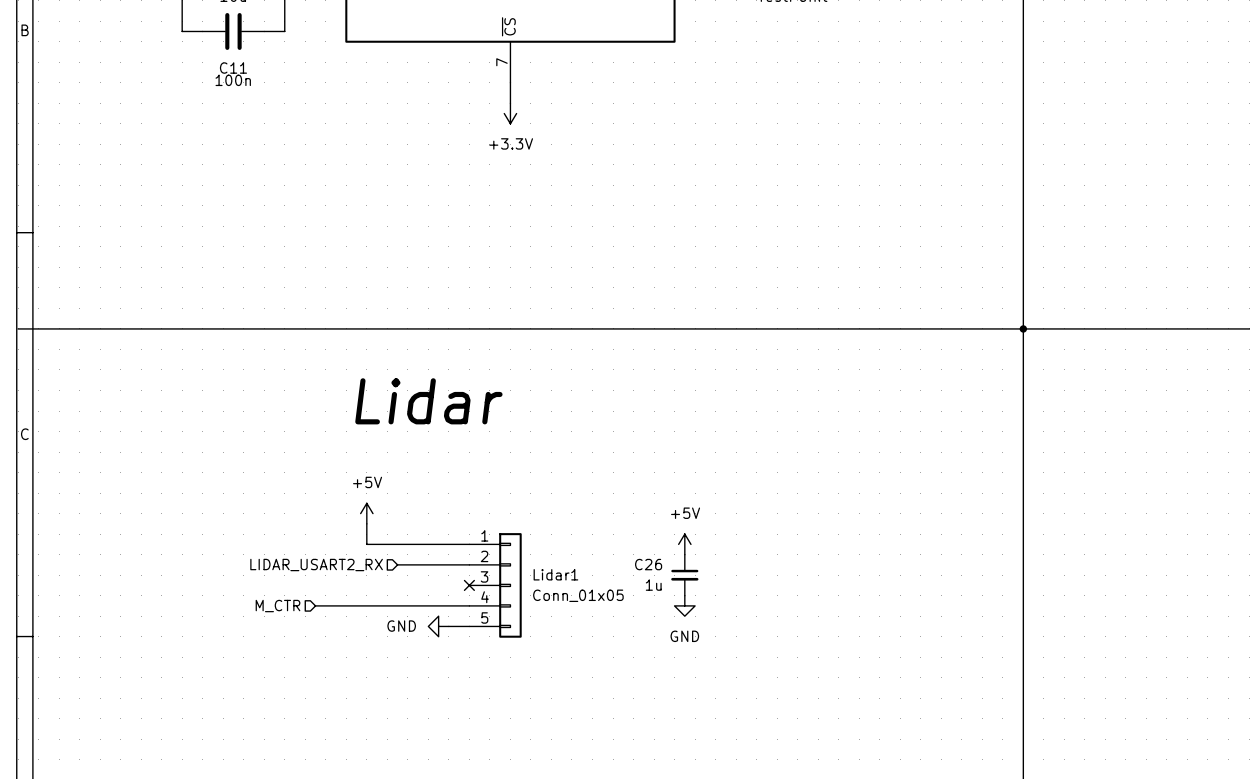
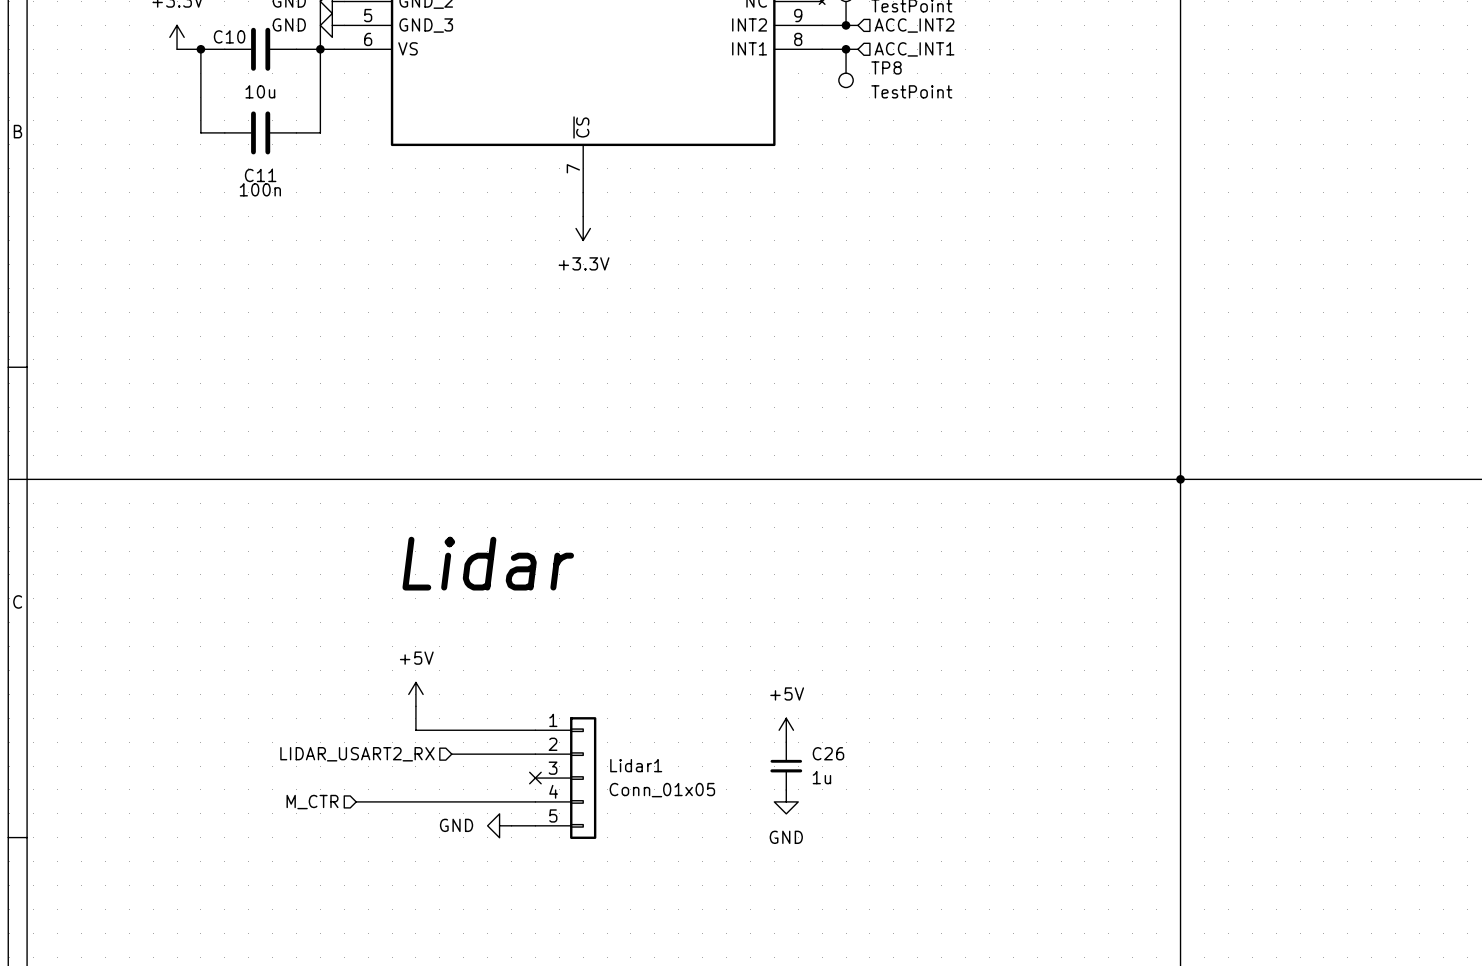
C26 name position: C26 (648, 564) -> C26 (828, 753)
C26 value position: 1u (653, 585) -> 1u (821, 777)

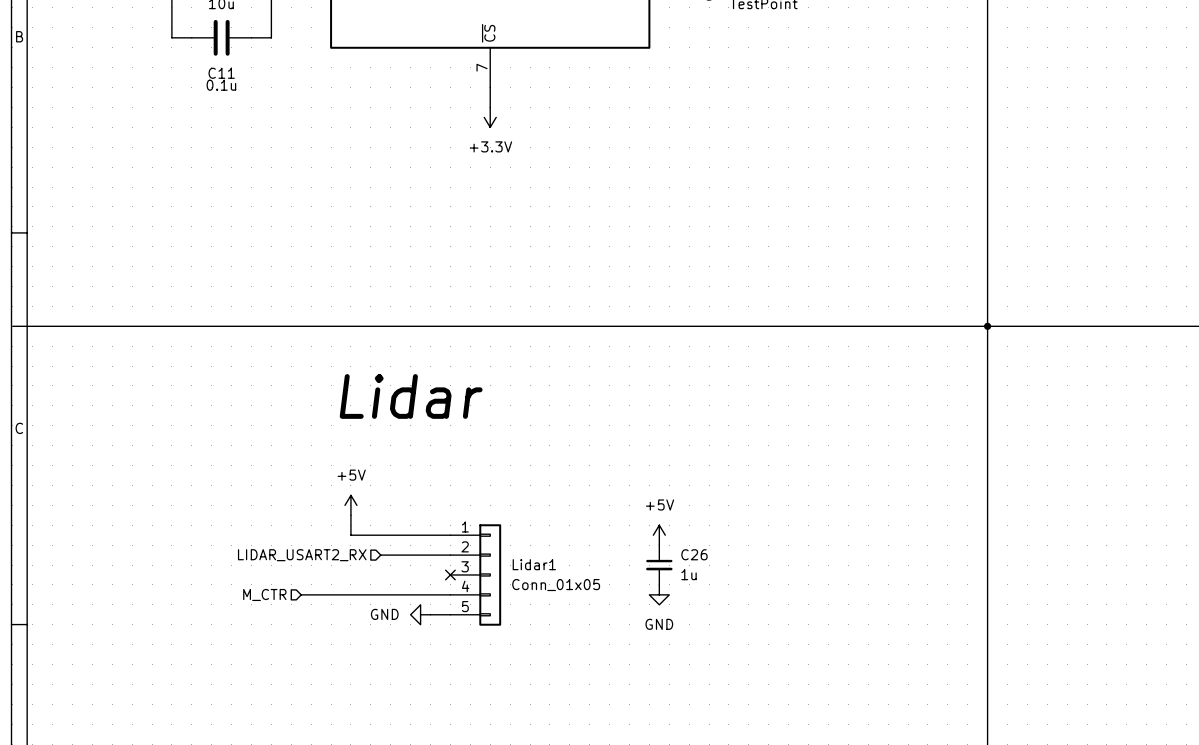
C11 value: 100n (260, 189) -> 0.1u (221, 85)

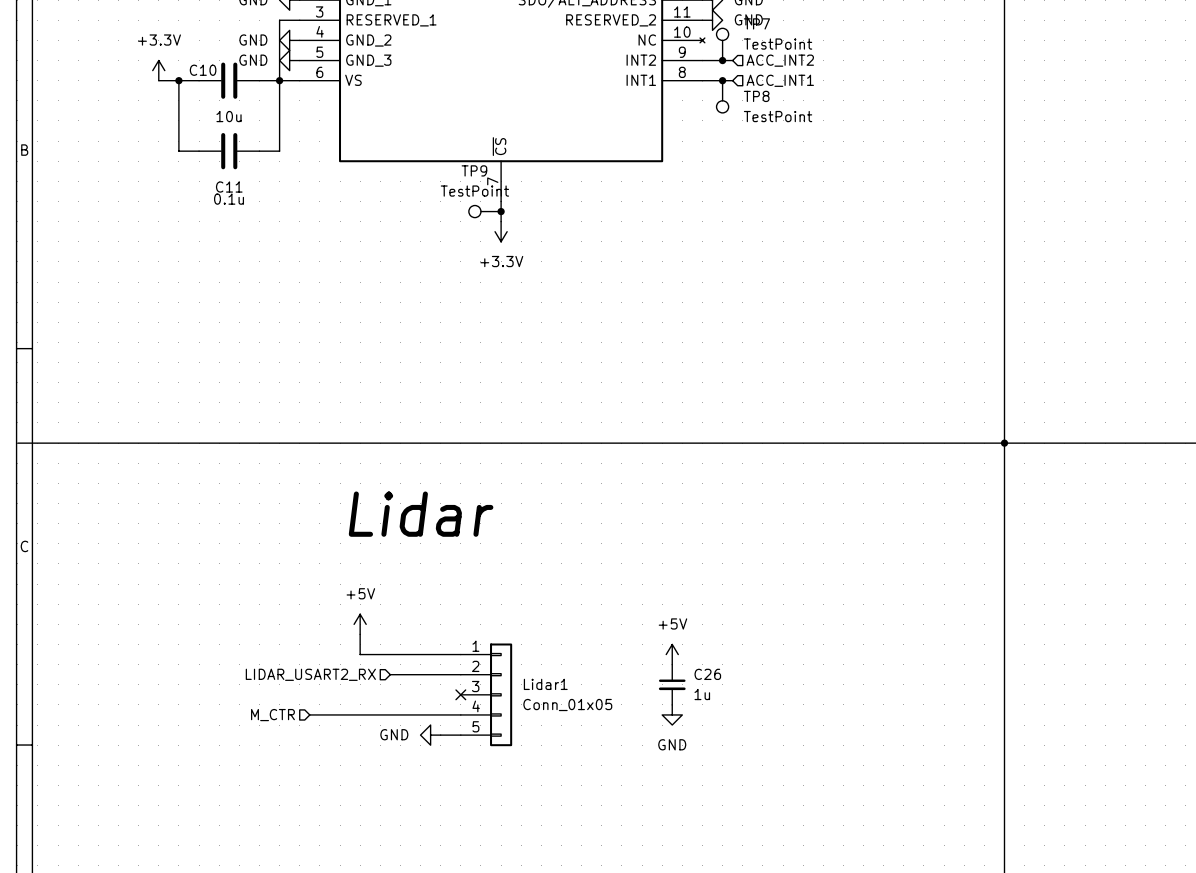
TP9: none -> TestPoint (484, 211)
junction: none -> (501, 211)

